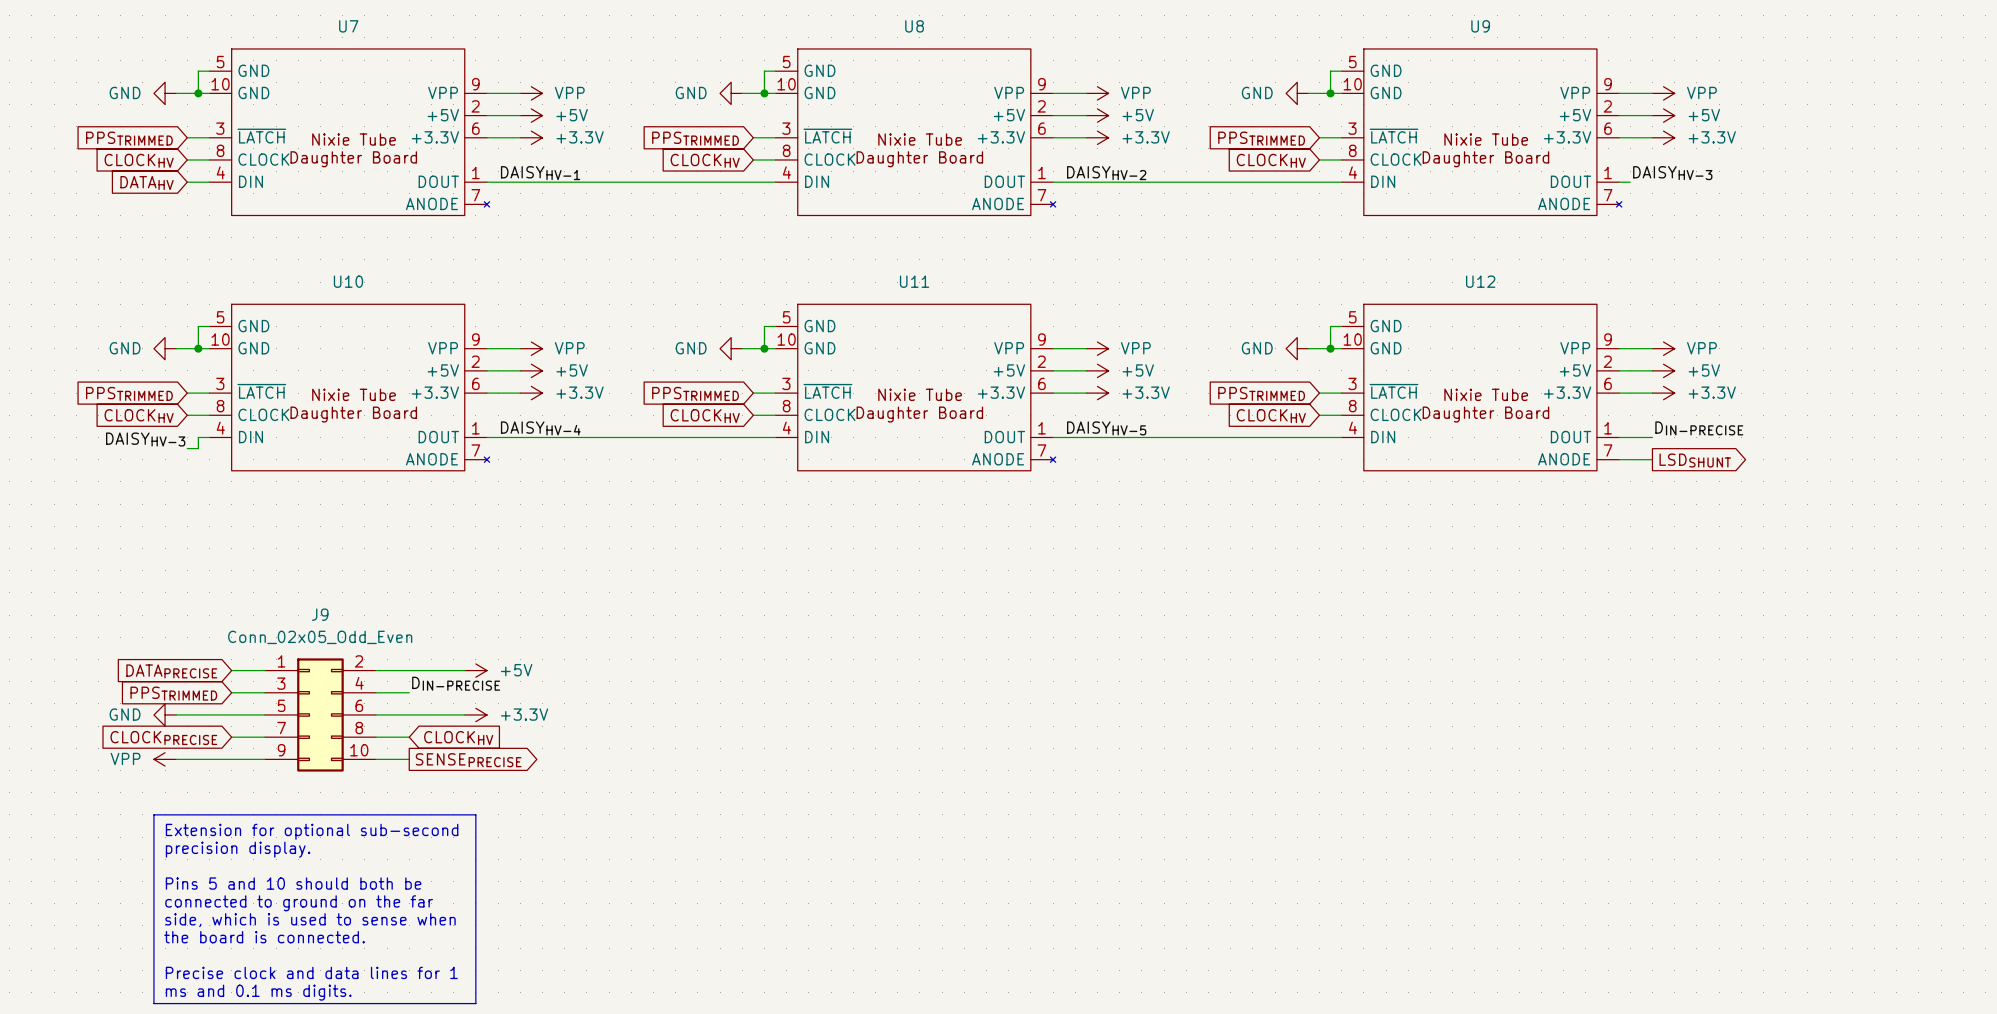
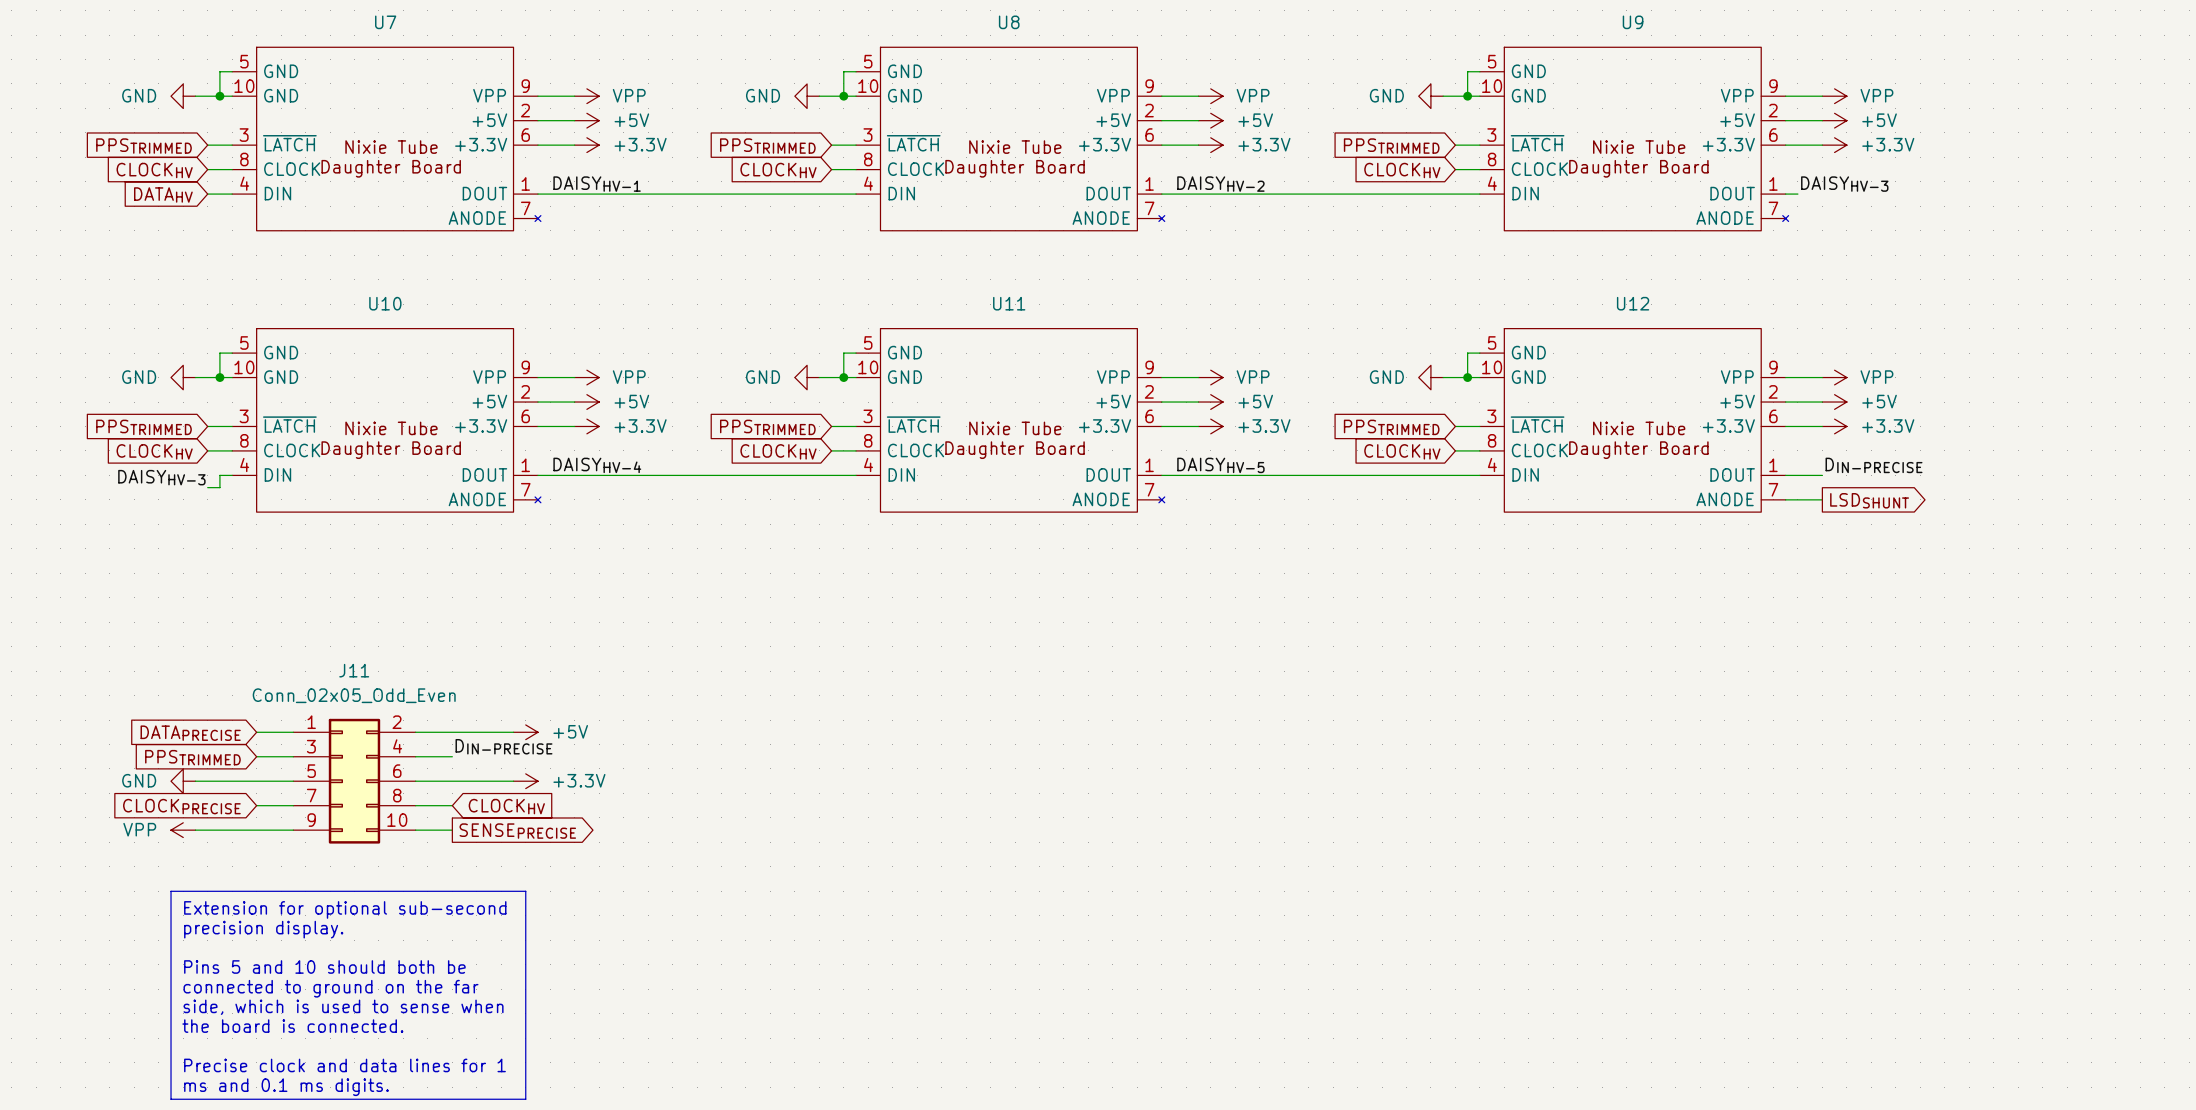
J9 name: J9 (320, 614) -> J11 (354, 670)

